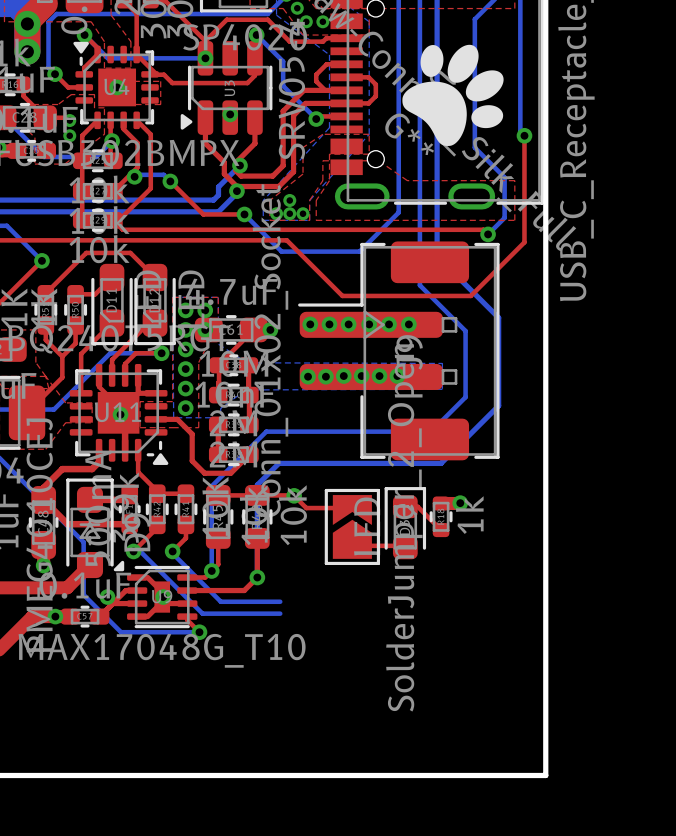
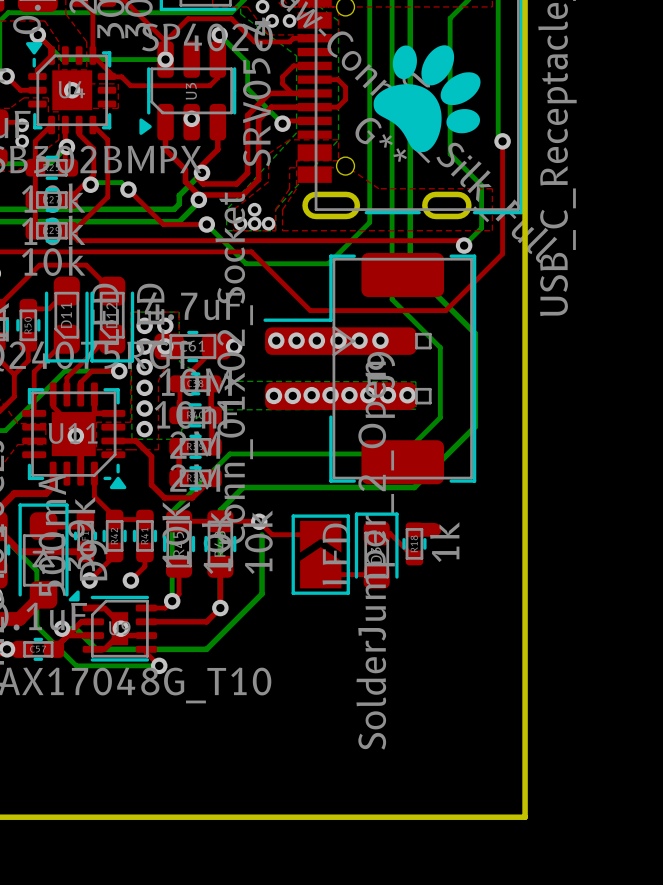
via: none -> (387, 395)
via: none -> (407, 395)
via: (460, 503) -> none
bottom track: none -> (262, 535) (262, 593) (206, 649) (96, 649) (75, 628) (62, 628)
bottom track: (133, 551) (140, 551) (202, 613) (280, 613) -> none
bottom track: (172, 551) (220, 601) (280, 601) -> none

